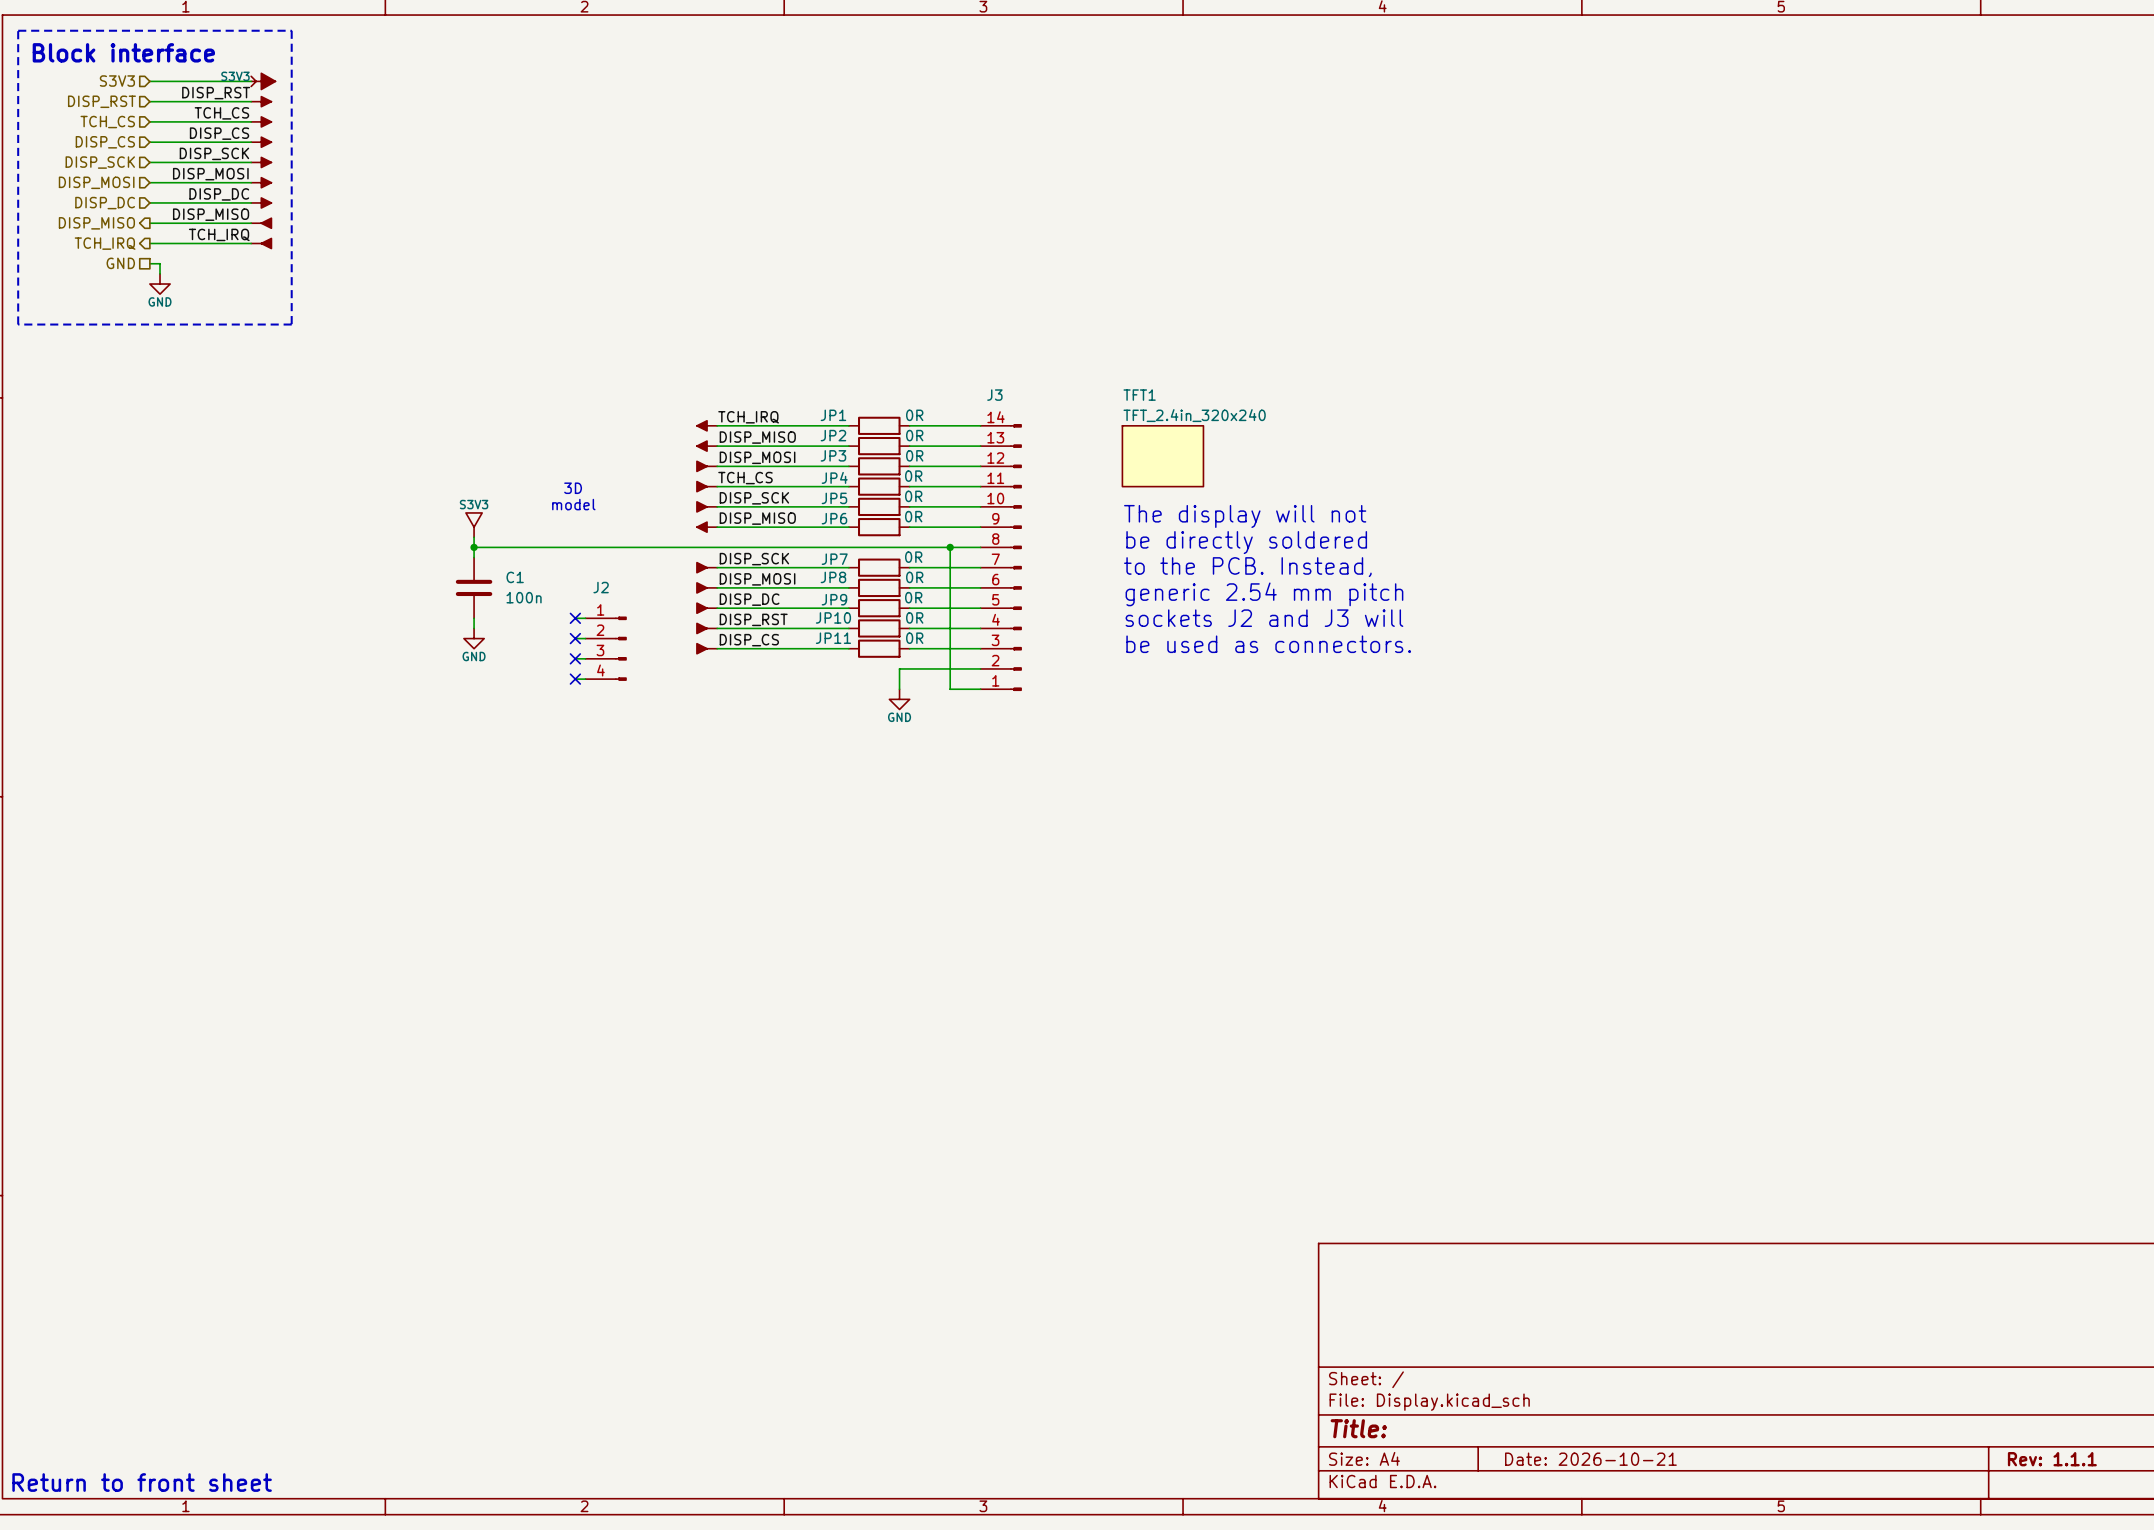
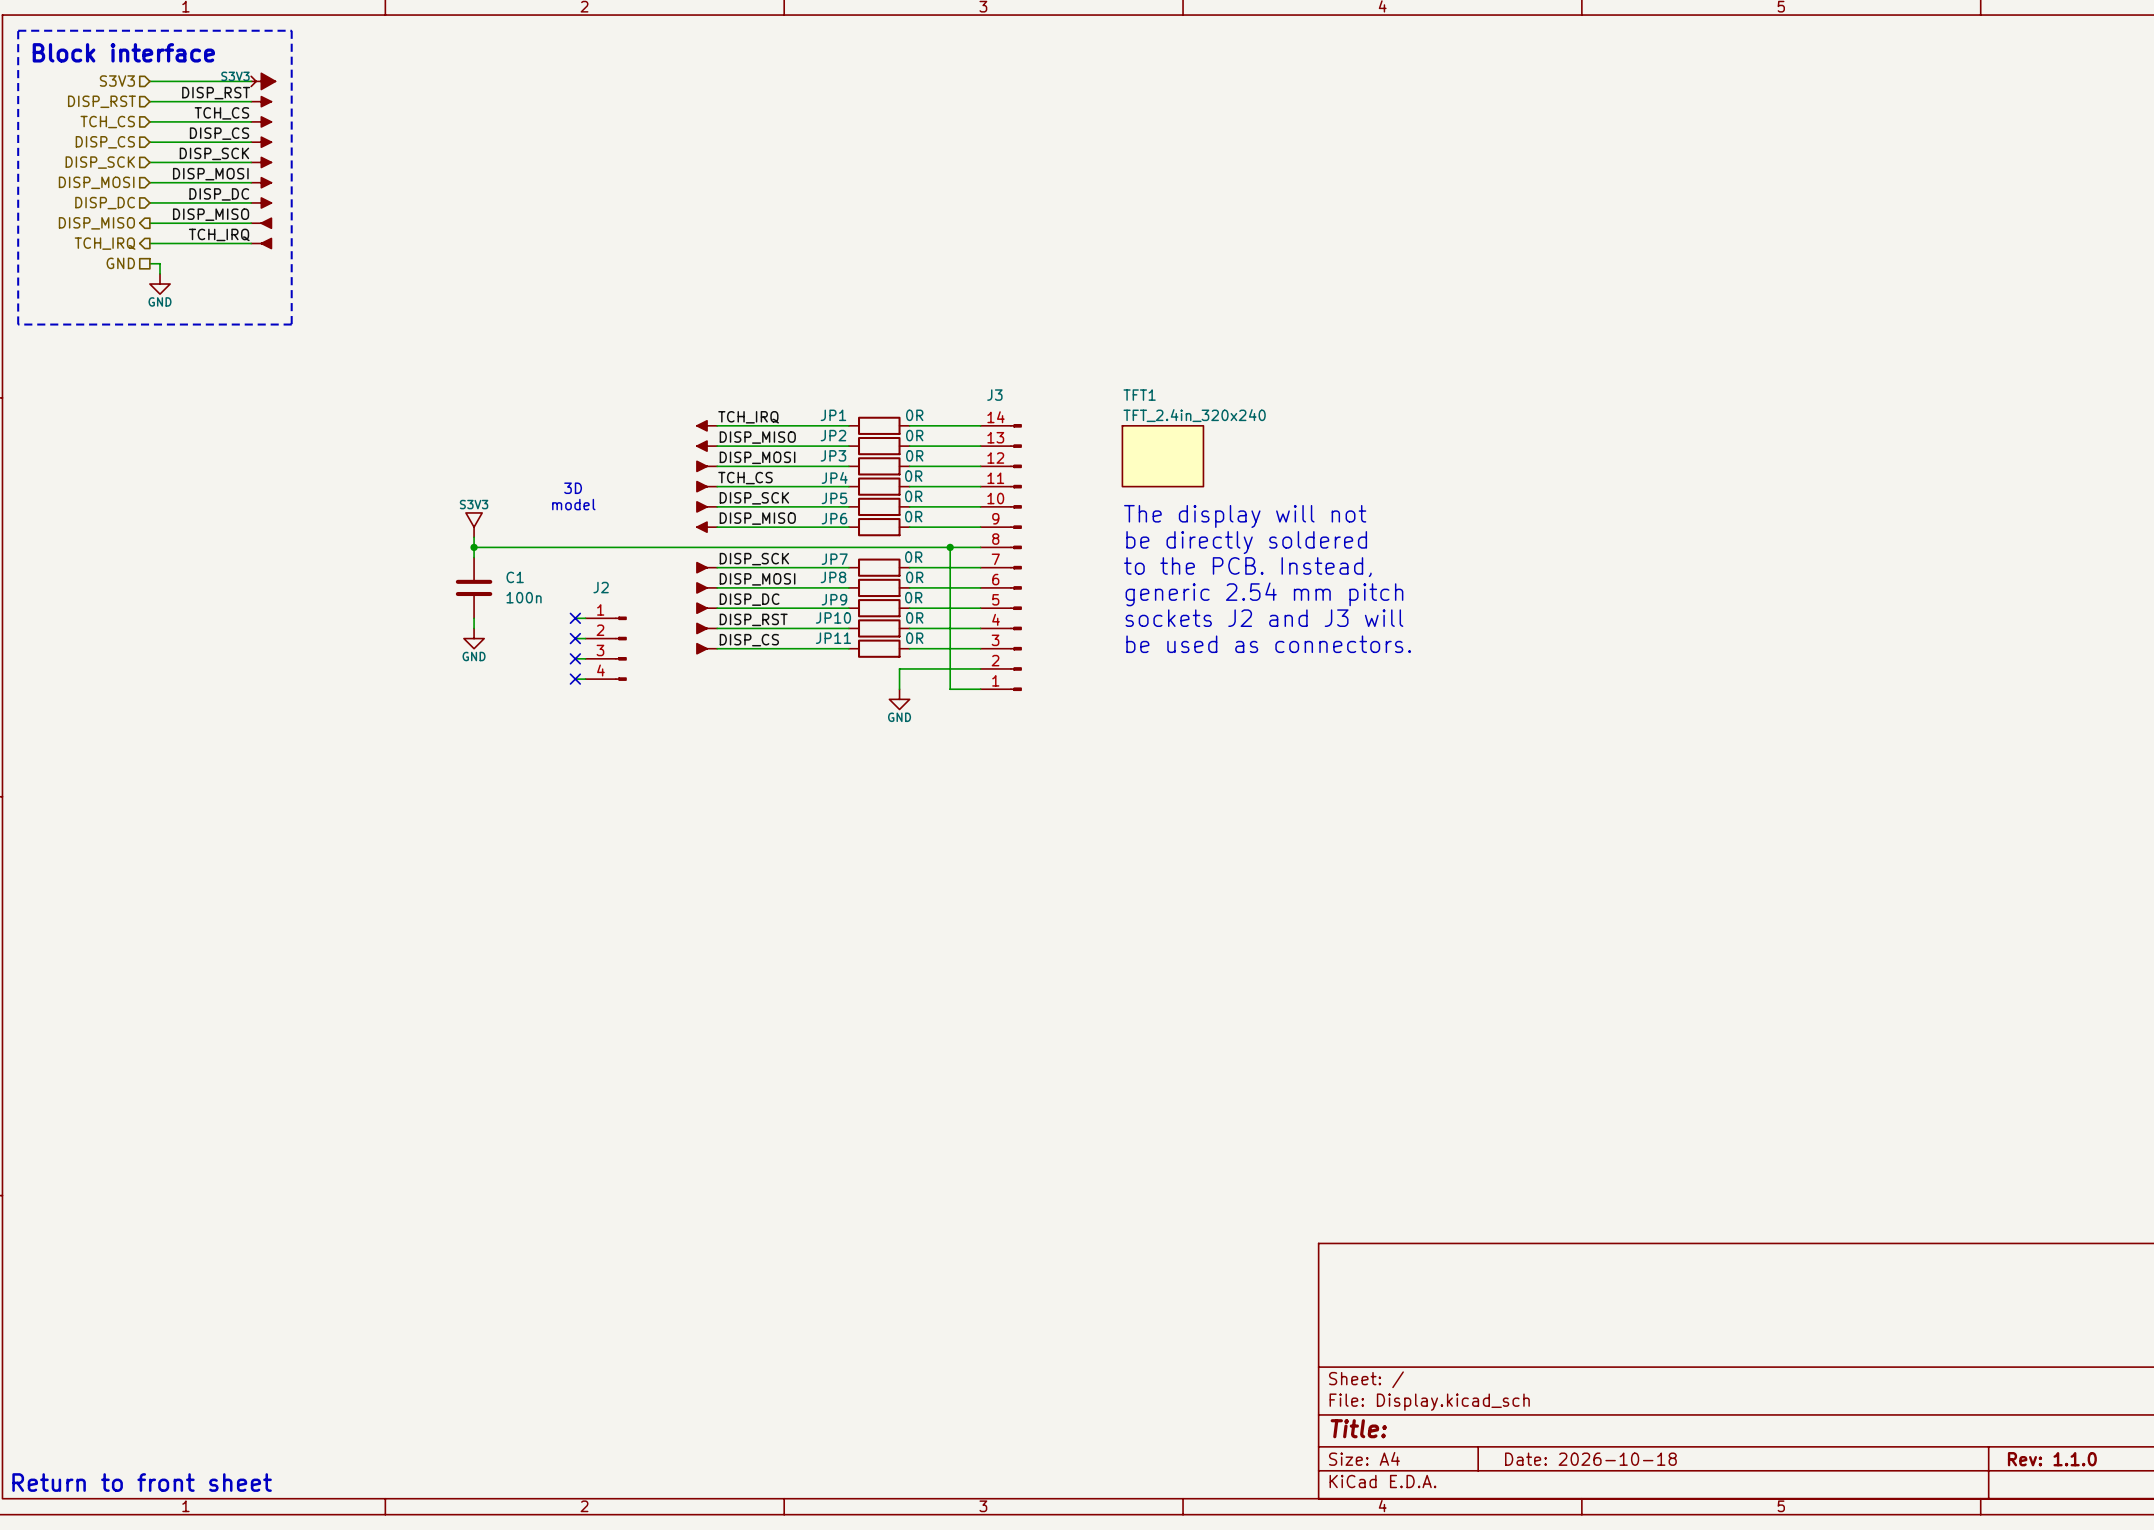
title block: Date: 2026-10-21 (1590, 1459) -> Date: 2026-10-18 (1590, 1459)
title block: Rev: 1.1.1 (2052, 1459) -> Rev: 1.1.0 (2052, 1459)

